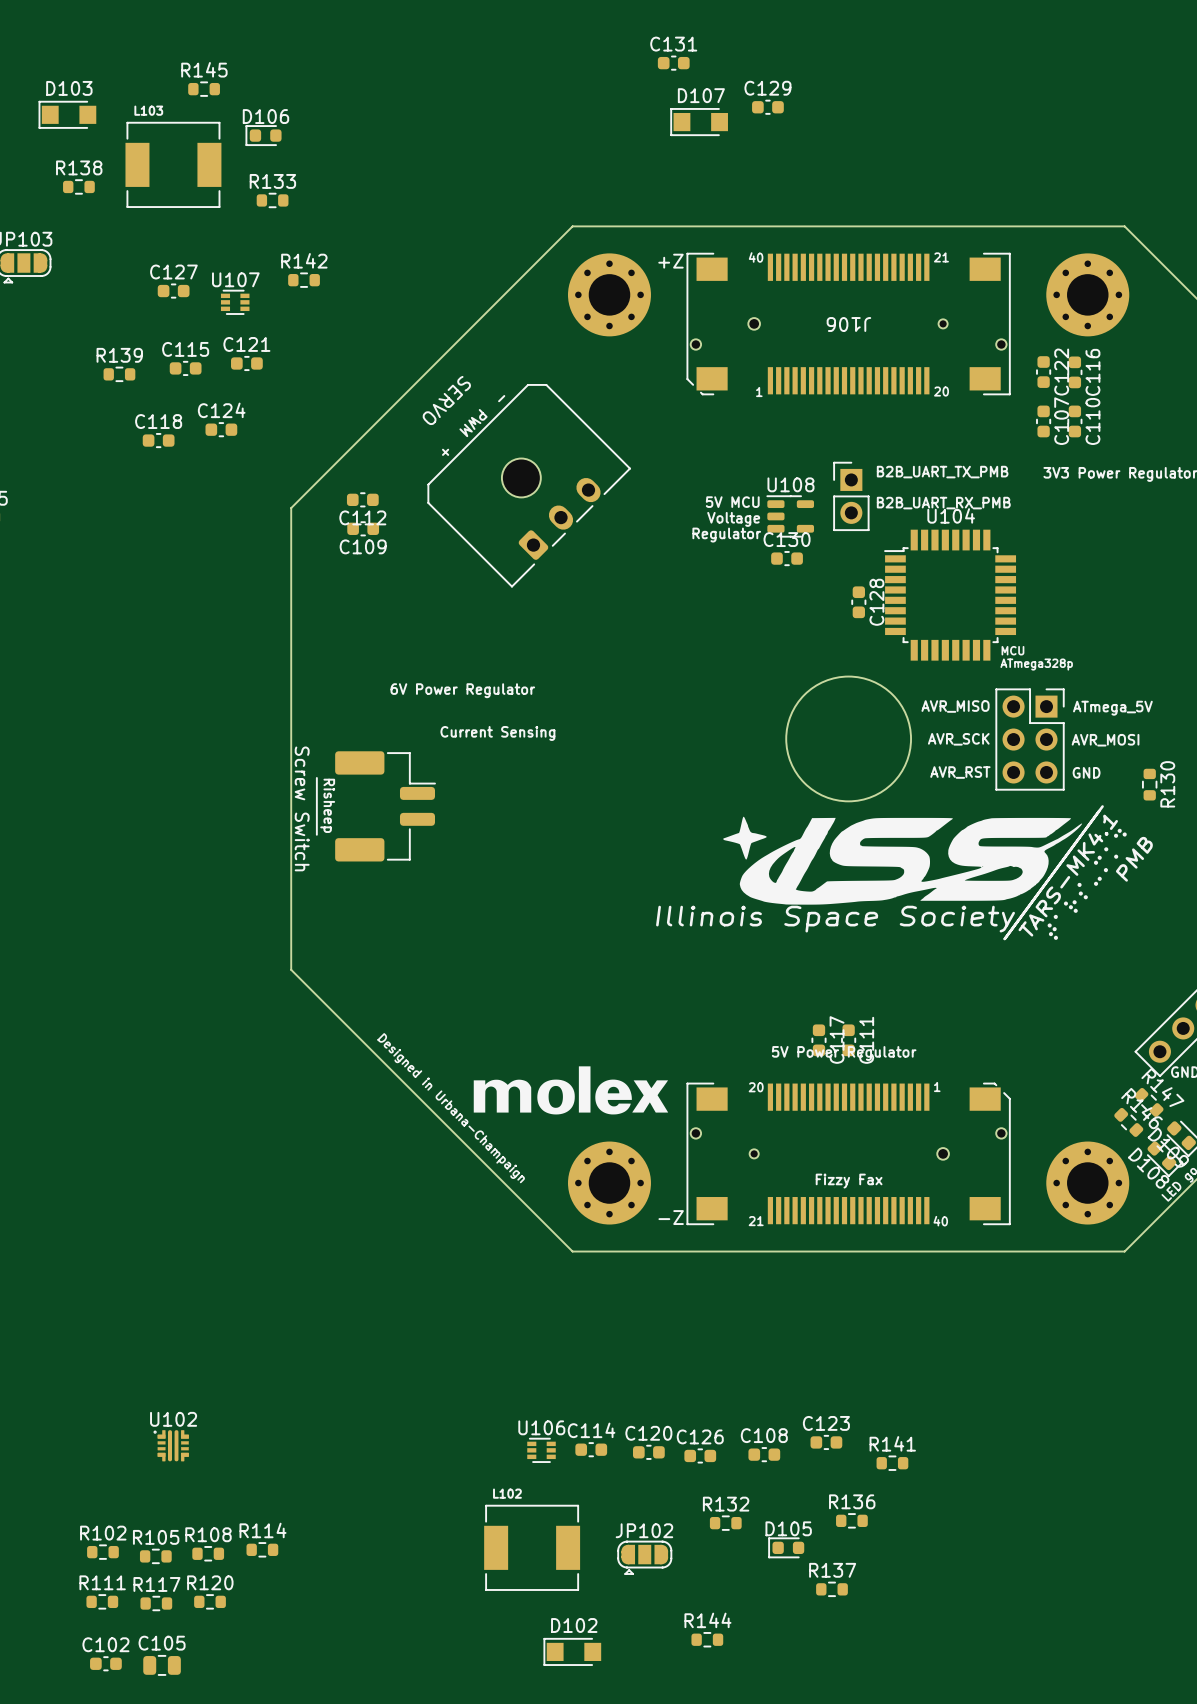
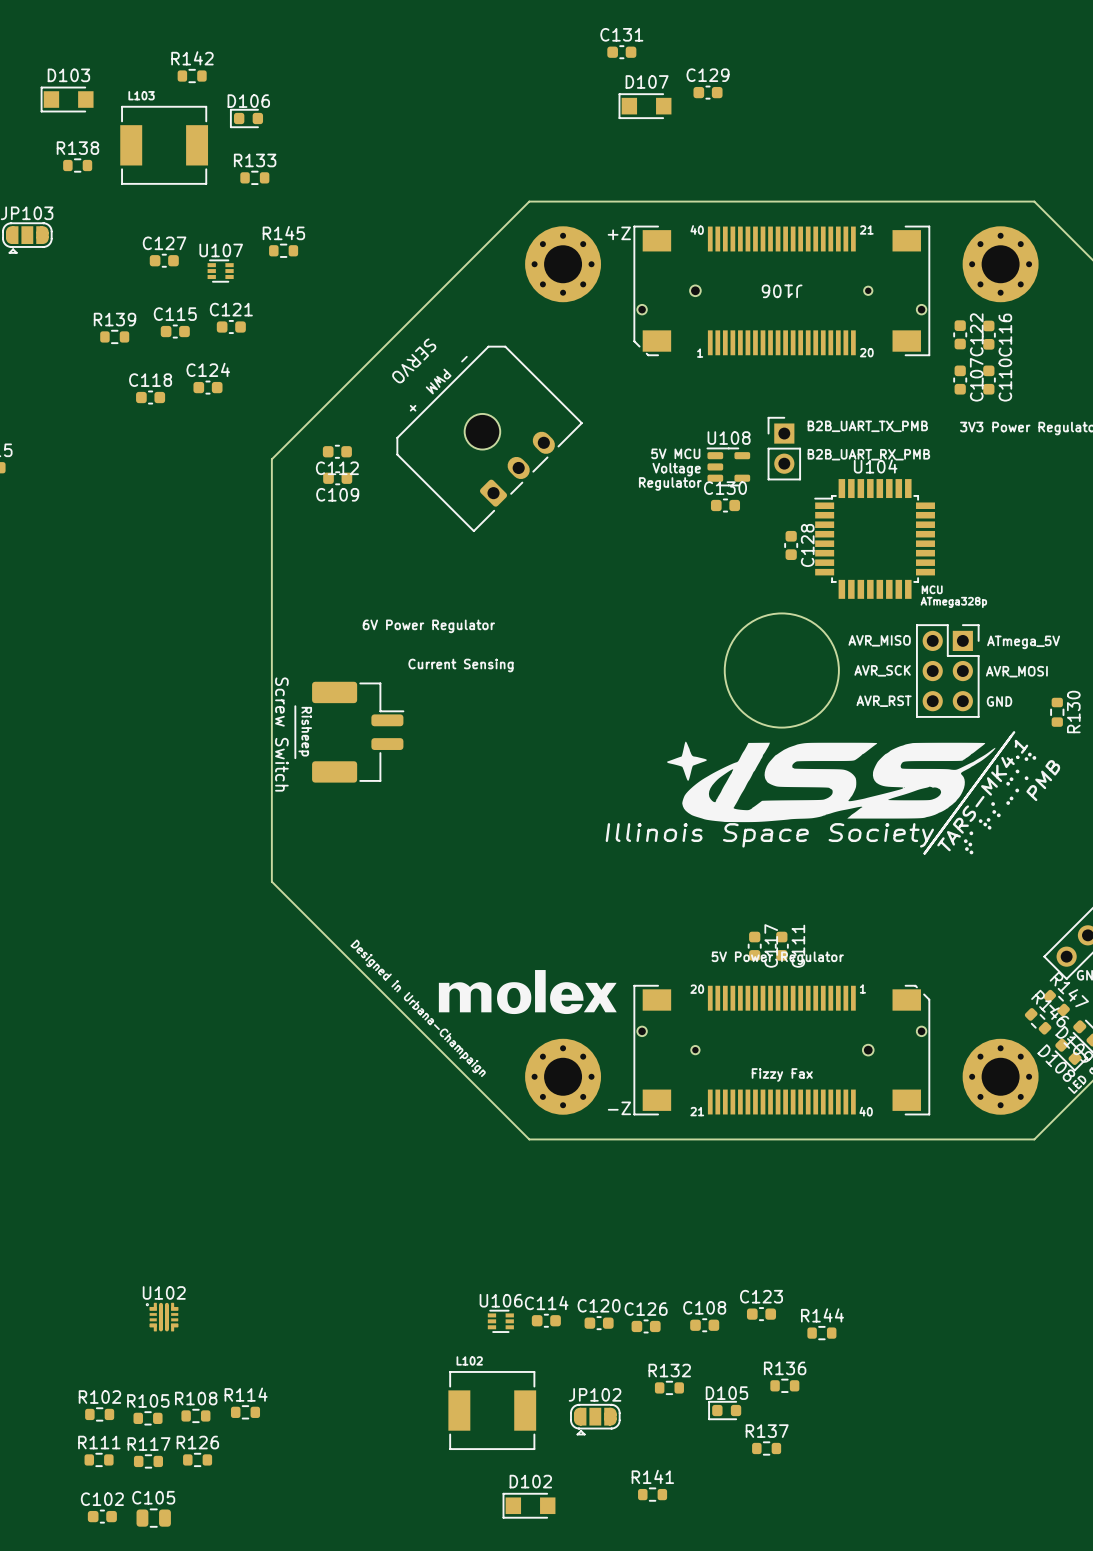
R145 name: R145 (204, 69) -> R142 (192, 58)
R142 name: R142 (304, 260) -> R145 (283, 233)
R141 name: R141 (892, 1443) -> R144 (822, 1315)
R120 name: R120 (210, 1582) -> R126 (197, 1442)
R144 name: R144 (707, 1620) -> R141 (652, 1476)

